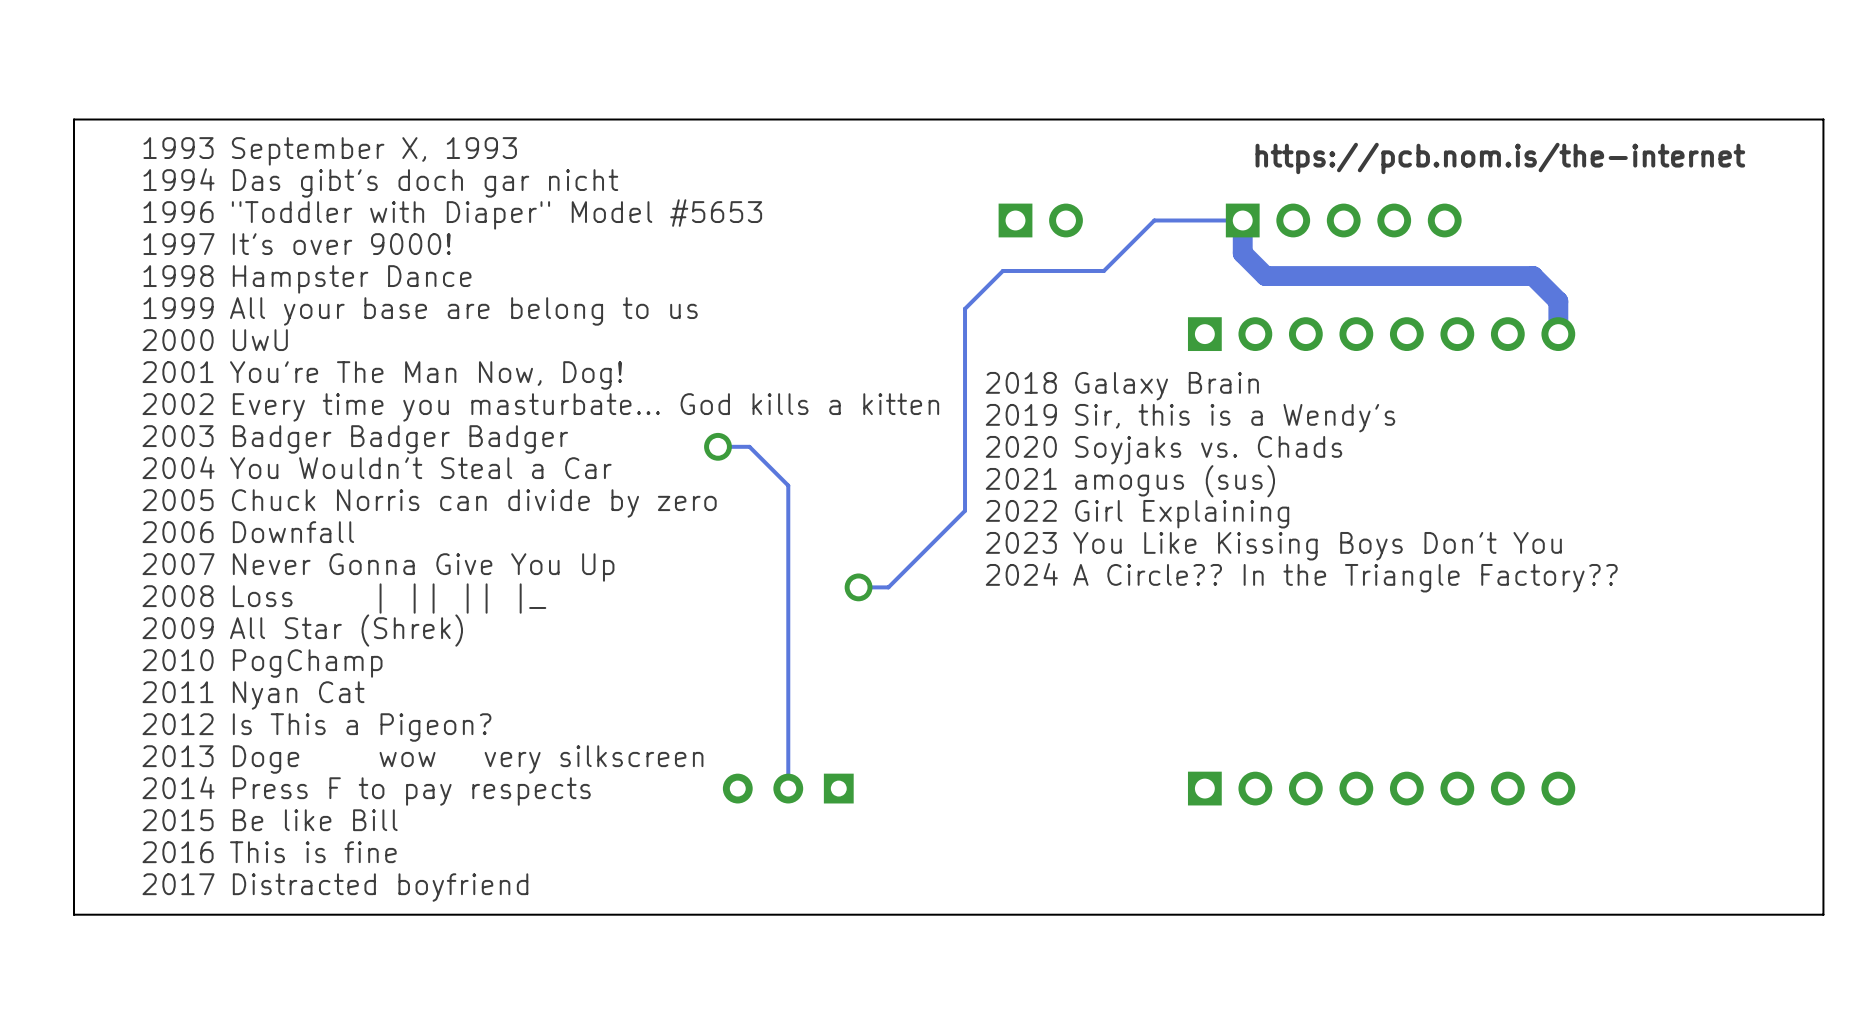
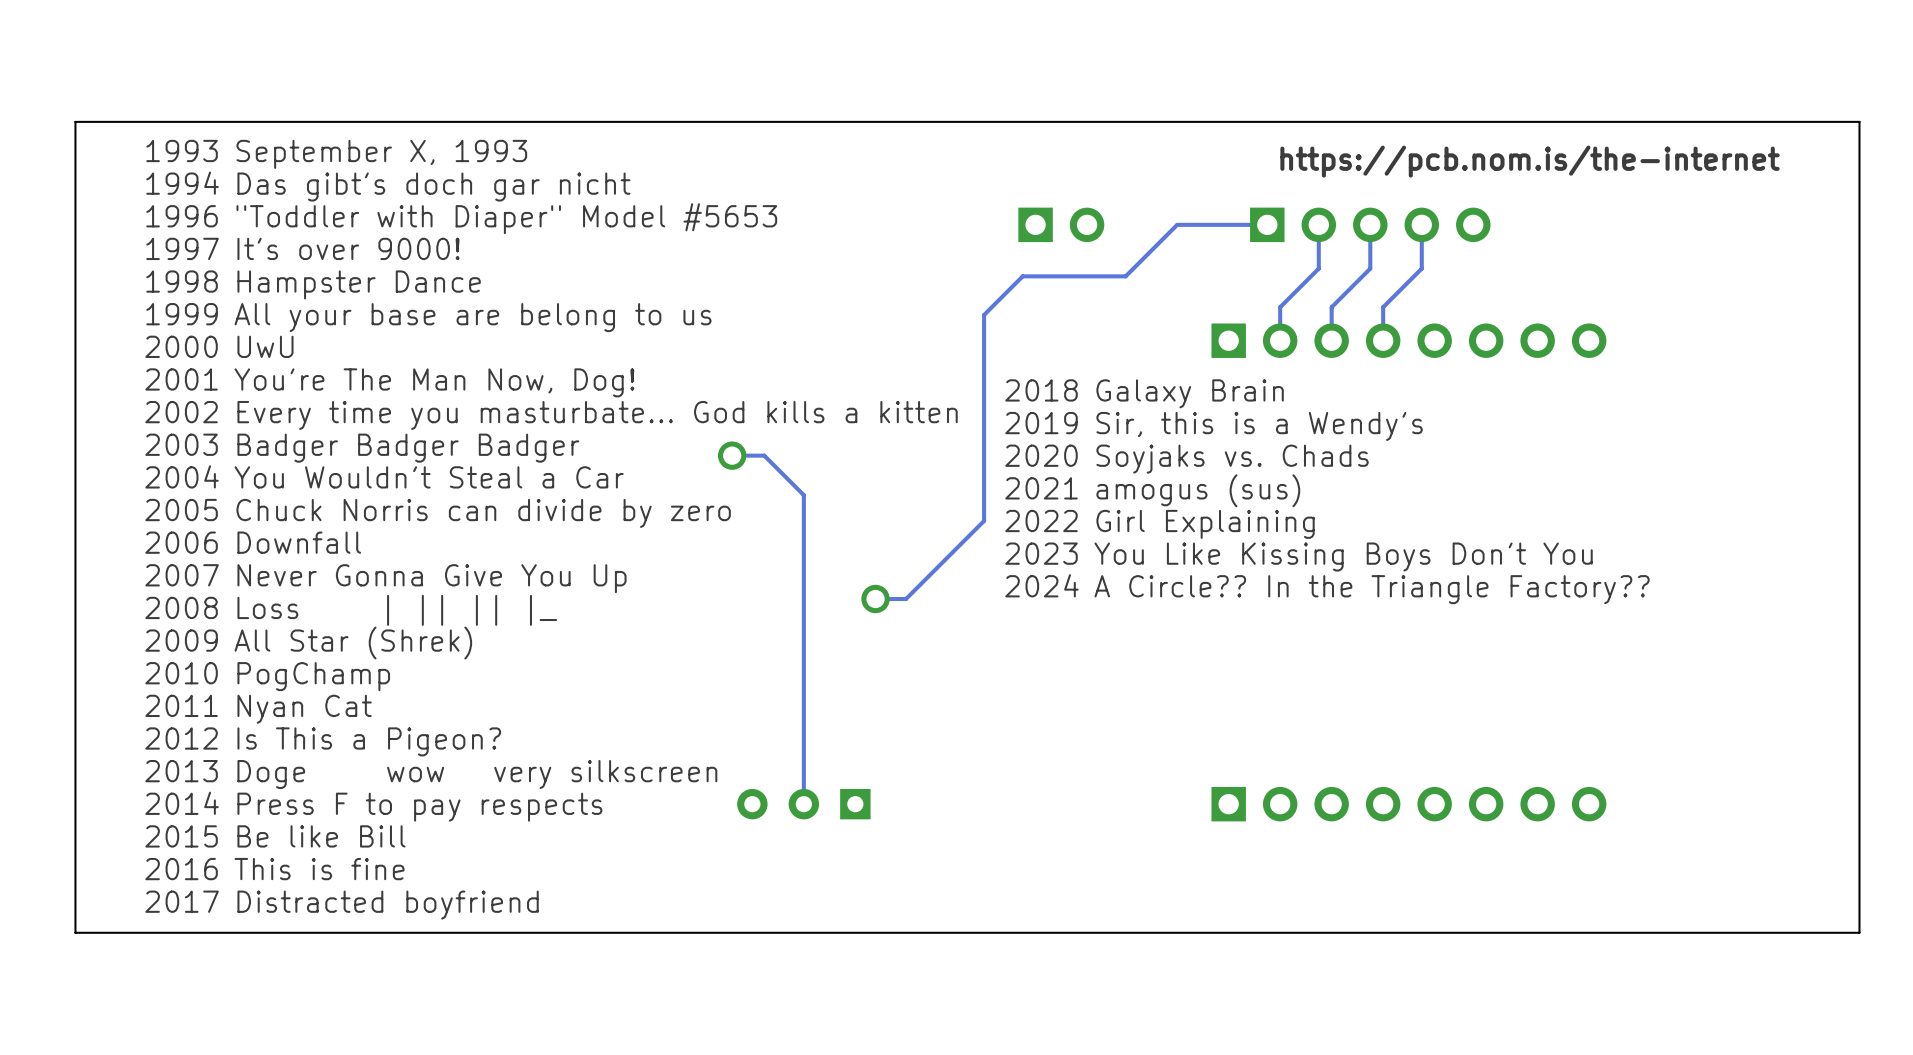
track: (1242, 220) (1242, 253) (1265, 276) (1533, 276) (1558, 301) (1558, 334) -> none
track: none -> (1318, 224) (1318, 268) (1280, 307) (1280, 340)
track: none -> (1370, 224) (1370, 268) (1331, 307) (1331, 340)
track: none -> (1421, 224) (1421, 268) (1383, 307) (1383, 340)

